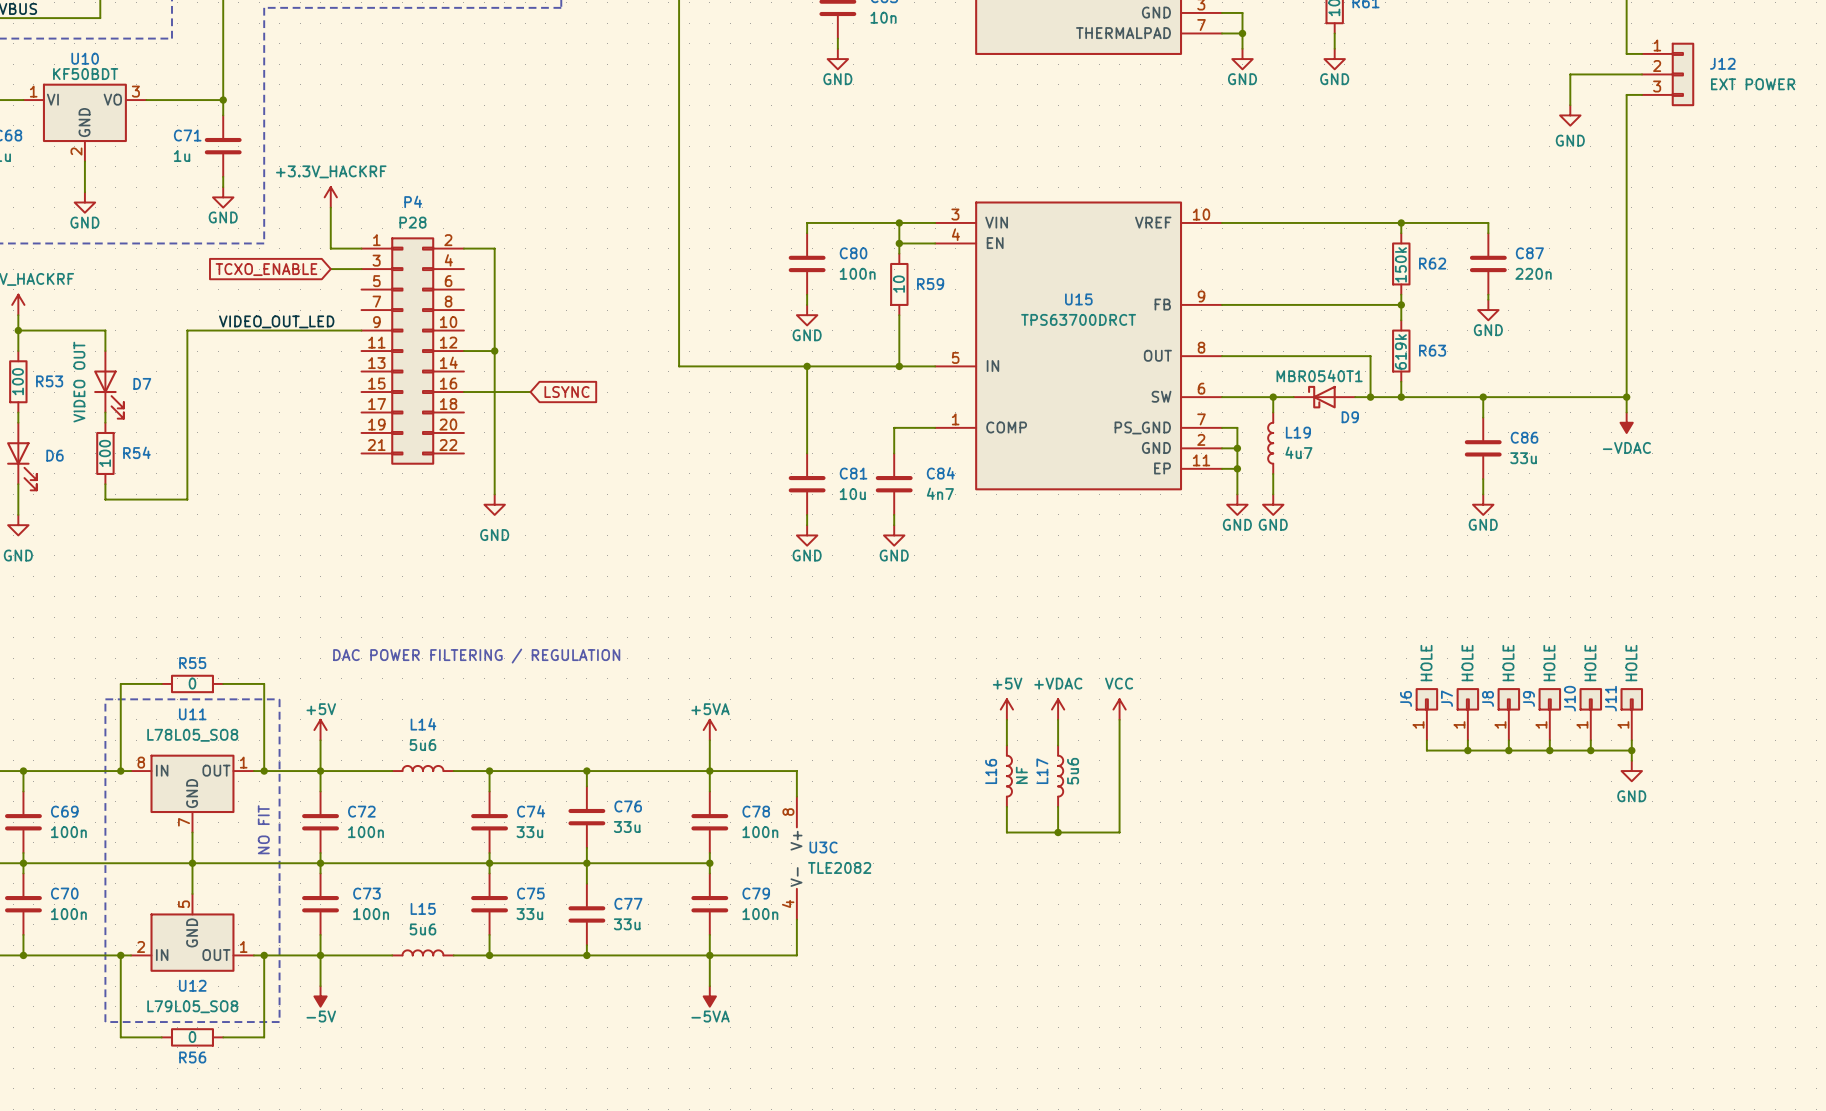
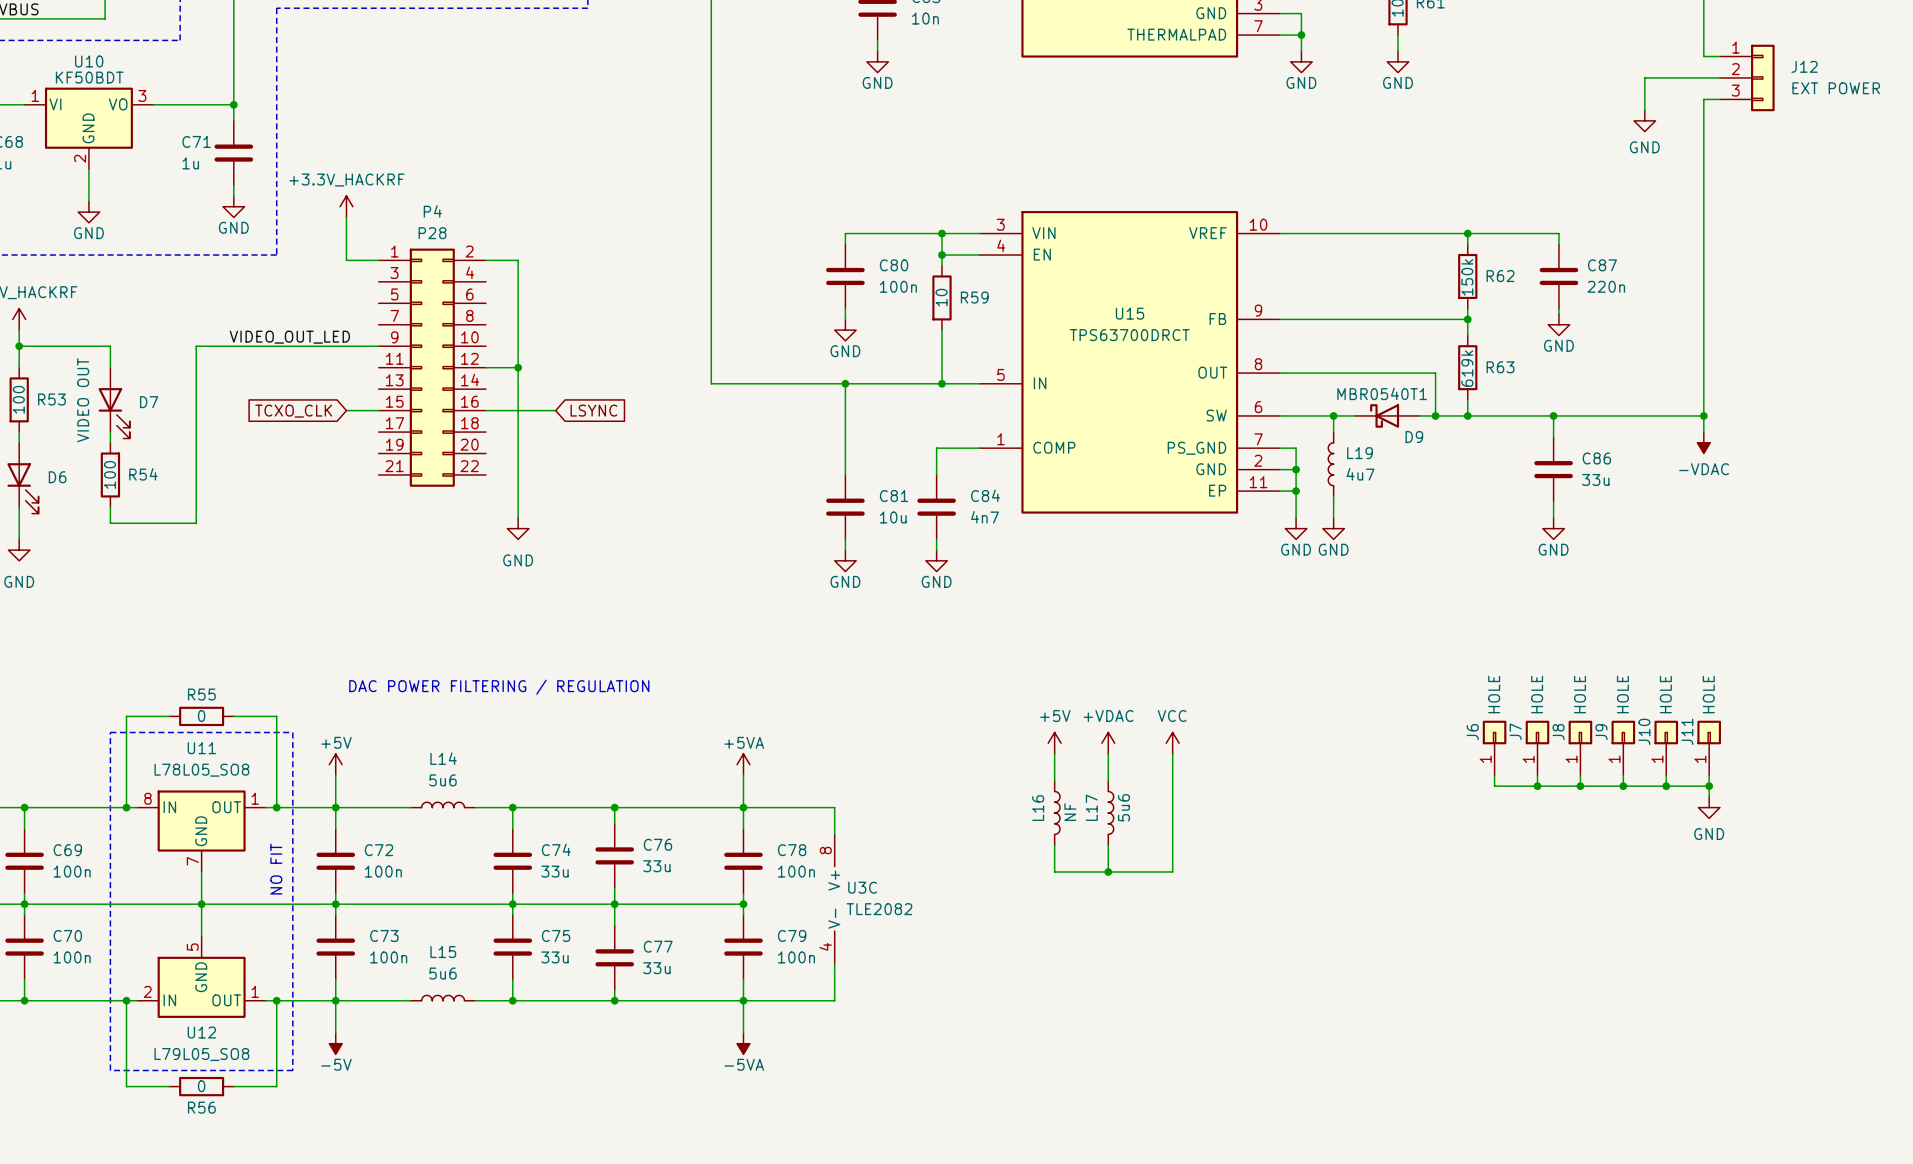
global label: TCXO_ENABLE (266, 269) -> none
wire: (330, 269) (361, 269) -> (346, 410) (378, 410)
global label: none -> TCXO_CLK (293, 411)

